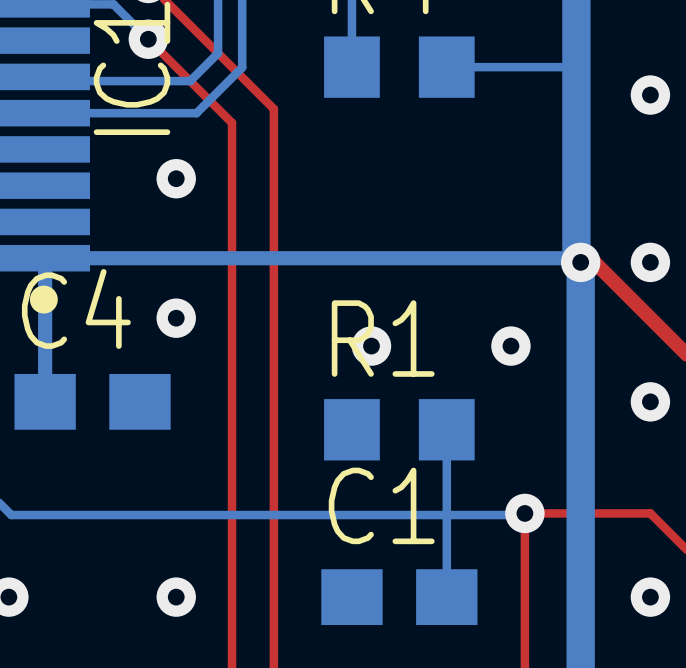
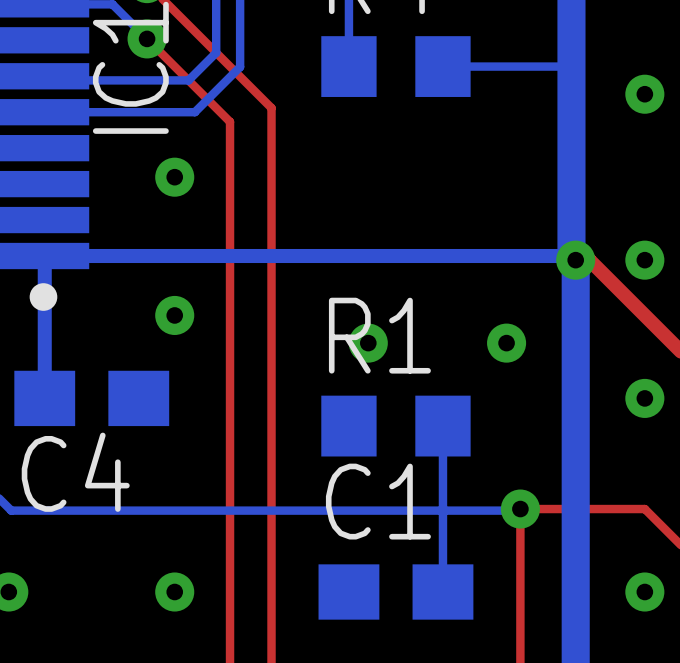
C4 name position: C4 (76, 308) -> C4 (75, 472)

